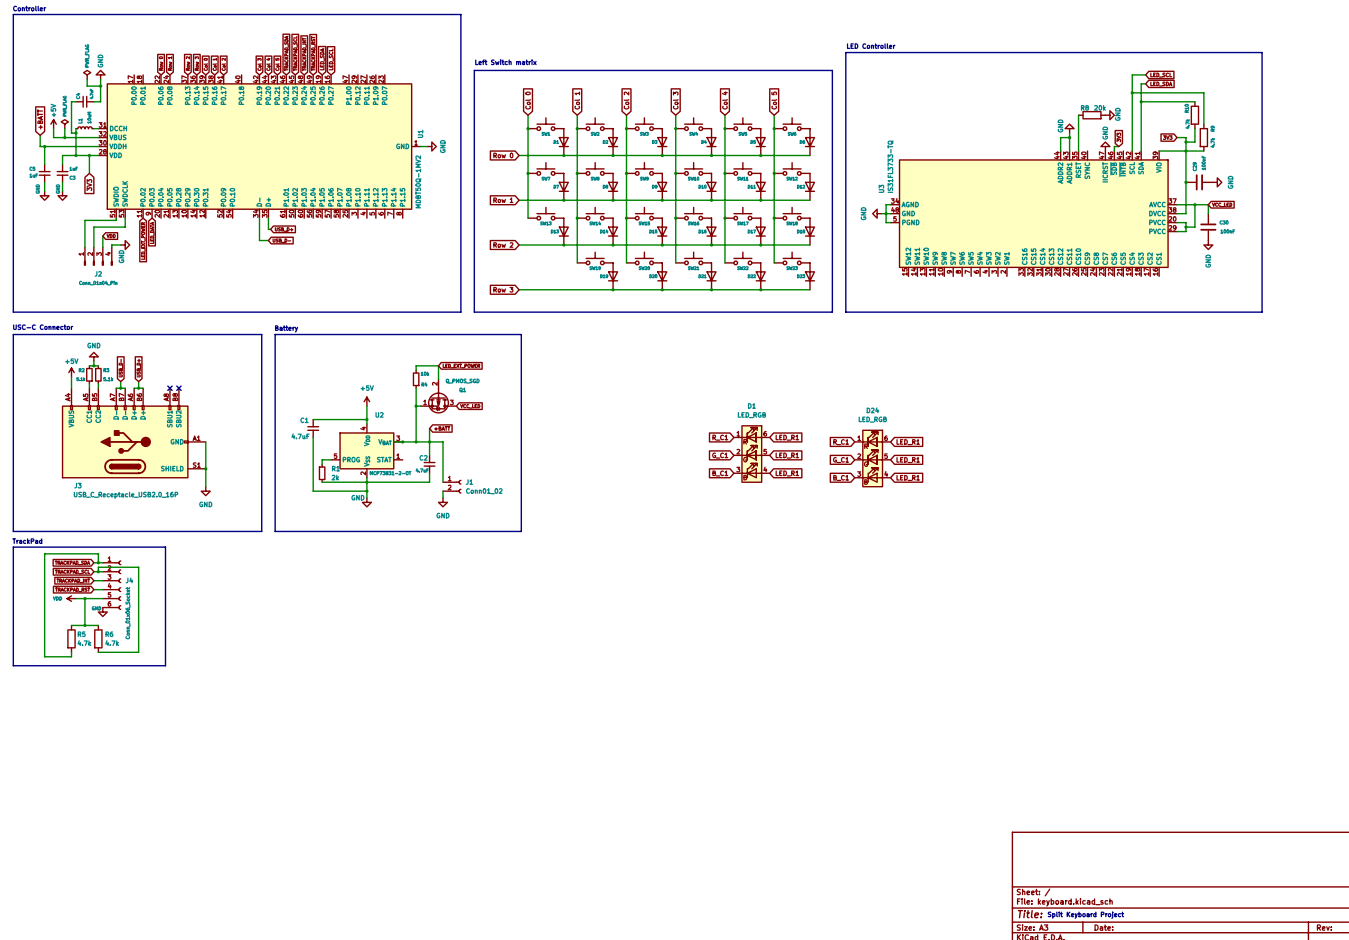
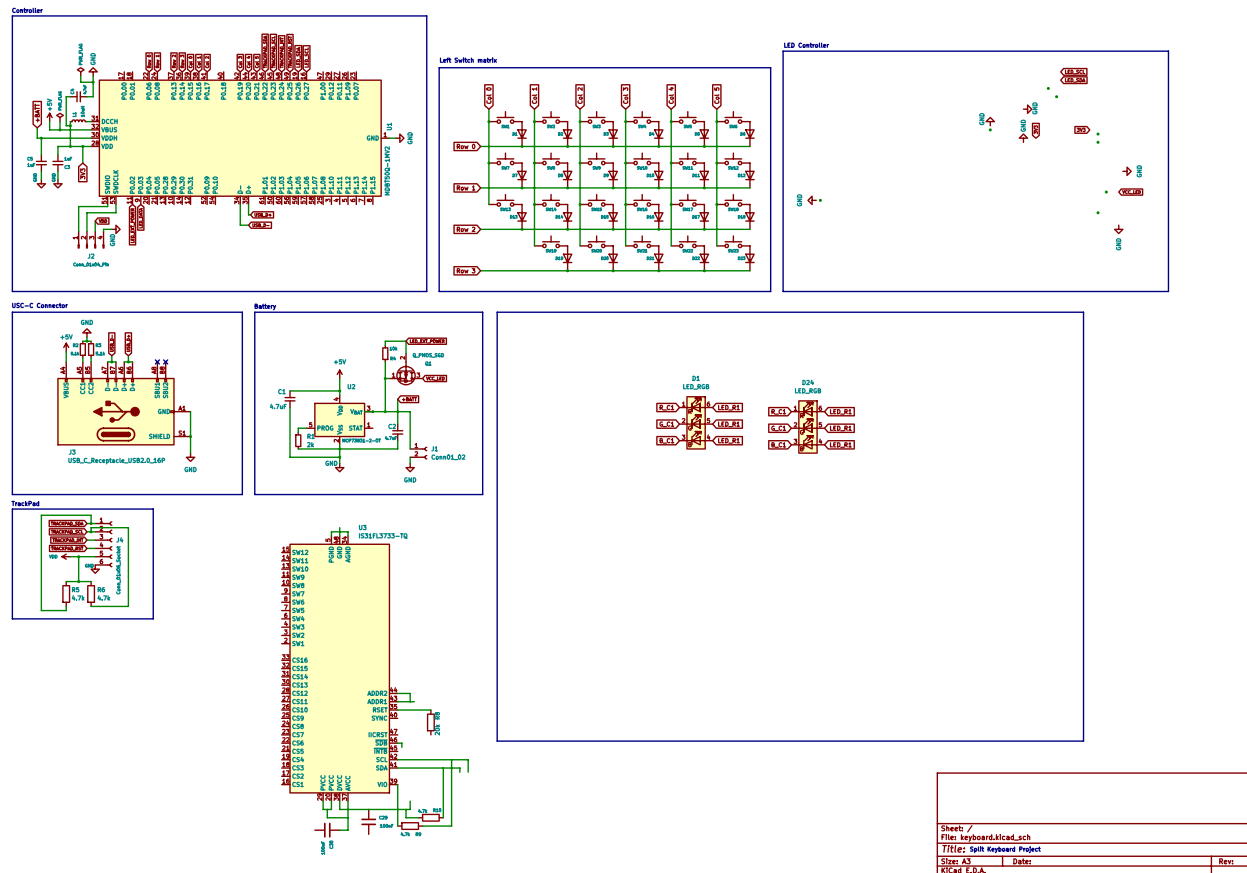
wire: (1145, 74) (1132, 74) (1132, 151) -> none
wire: (1145, 83) (1141, 83) (1141, 151) -> none
wire: (1132, 92) (1203, 92) (1203, 124) -> none
wire: (1141, 101) (1194, 101) -> none
wire: (1078, 115) (1078, 151) -> none
part rotation: 0° (1091, 115) -> 90° clockwise (430, 722)
part position: (1091, 115) -> (430, 722)
part rotation: 0° (1194, 115) -> 90° clockwise (430, 817)
part position: (1194, 115) -> (430, 817)
wire: (1194, 128) (1194, 142) (1185, 142) -> none
wire: (1069, 133) (1069, 151) -> none
wire: (1069, 137) (1060, 137) (1060, 151) -> none
wire: (1177, 137) (1185, 137) (1185, 213) (1177, 213) -> none
part rotation: 0° (1203, 137) -> 90° clockwise (410, 826)
part position: (1203, 137) -> (410, 826)
wire: (1118, 146) (1114, 146) (1114, 151) -> none
wire: (1159, 151) (1203, 151) -> none
junction: (1185, 182) -> none
part rotation: 0° (1199, 182) -> 90° clockwise (368, 821)
part position: (1199, 182) -> (368, 821)
wire: (890, 204) (886, 204) (886, 222) (890, 222) -> none
wire: (1177, 204) (1208, 204) (1208, 213) -> none
wire: (1194, 204) (1194, 227) (1185, 227) -> none
wire: (881, 213) (890, 213) -> none
part rotation: 0° (1033, 213) -> 90° clockwise (339, 668)
part position: (1033, 213) -> (339, 668)
wire: (1177, 222) (1185, 222) (1185, 231) (1177, 231) -> none
part rotation: 0° (1208, 227) -> 90° clockwise (327, 830)
part position: (1208, 227) -> (327, 830)
line: none -> (497, 312) (1083, 312) (1083, 741) (497, 741) (497, 312)
wire: none -> (339, 527) (339, 535)
wire: none -> (331, 535) (331, 531) (348, 531) (348, 535)
wire: none -> (397, 693) (410, 693) (410, 701)
wire: none -> (397, 701) (414, 701)
wire: none -> (397, 710) (430, 710)
wire: none -> (397, 743) (401, 743) (401, 747)
wire: none -> (397, 759) (468, 759) (468, 772)
wire: none -> (451, 759) (451, 826) (422, 826)
wire: none -> (397, 768) (459, 768) (459, 772)
wire: none -> (443, 768) (443, 817)
wire: none -> (397, 784) (397, 826)
wire: none -> (323, 801) (323, 809) (331, 809) (331, 801)
wire: none -> (339, 801) (339, 809) (410, 809) (410, 801)
wire: none -> (348, 801) (348, 830) (339, 830)
wire: none -> (327, 809) (327, 817) (348, 817)
wire: none -> (406, 809) (406, 817) (418, 817)

